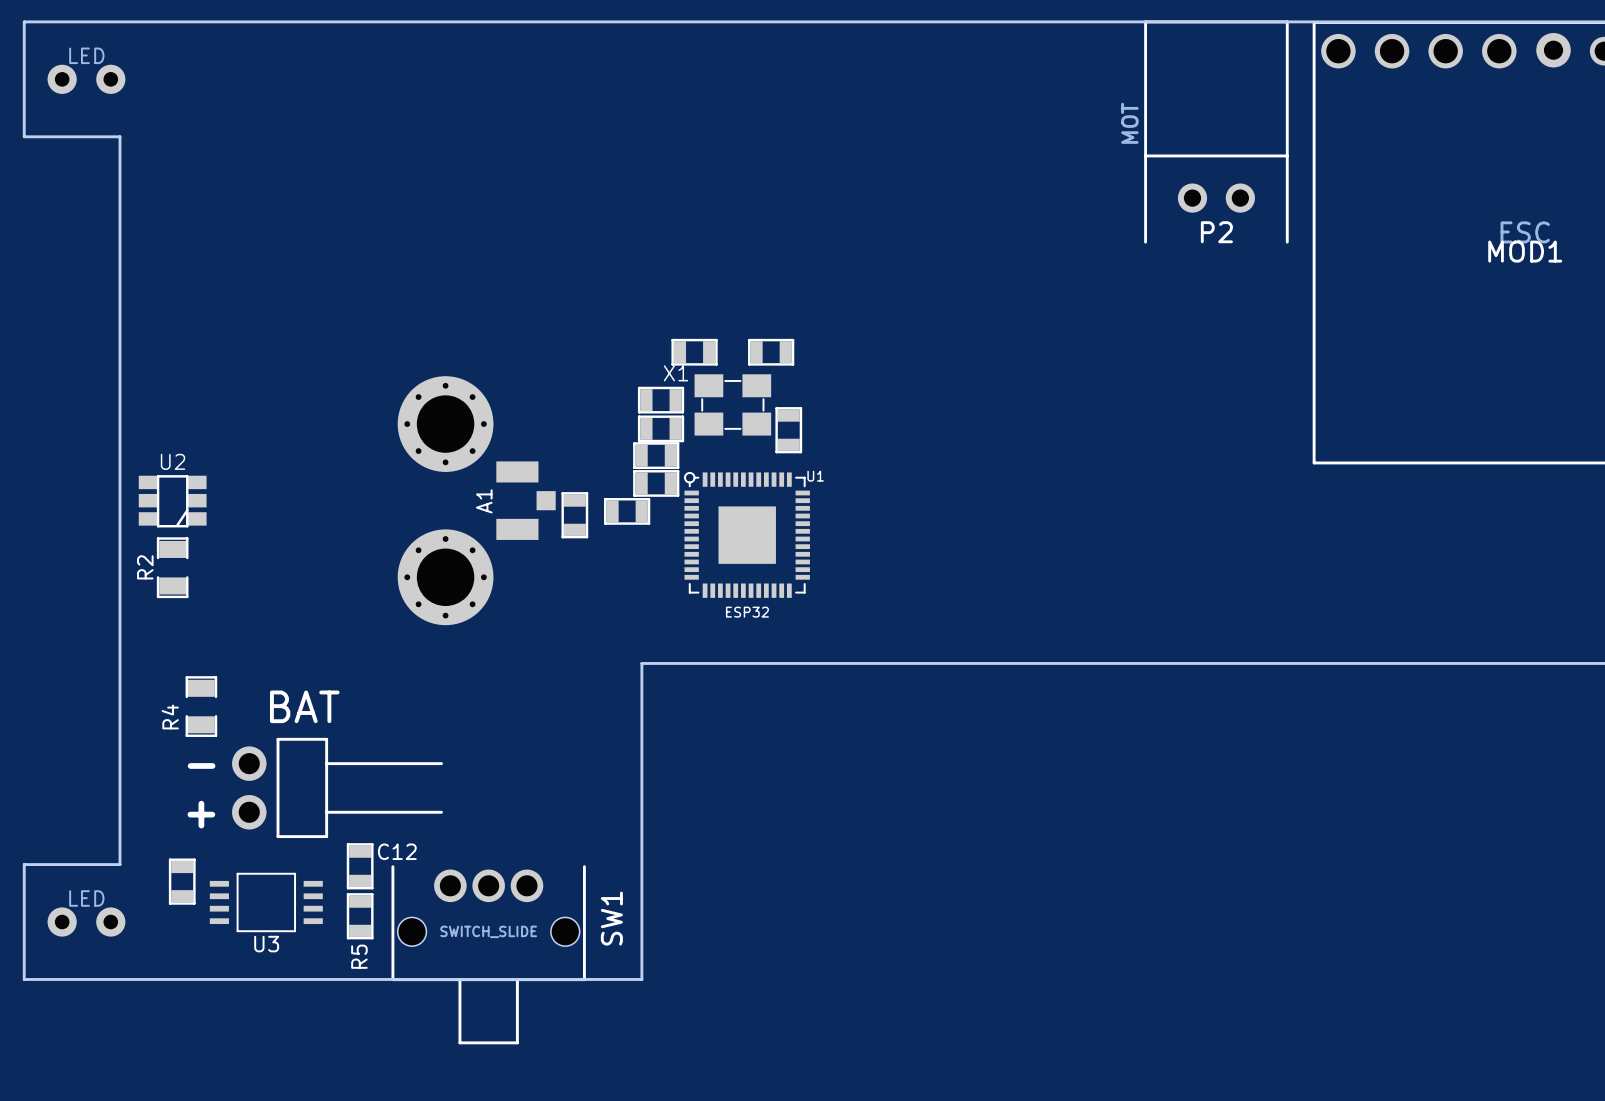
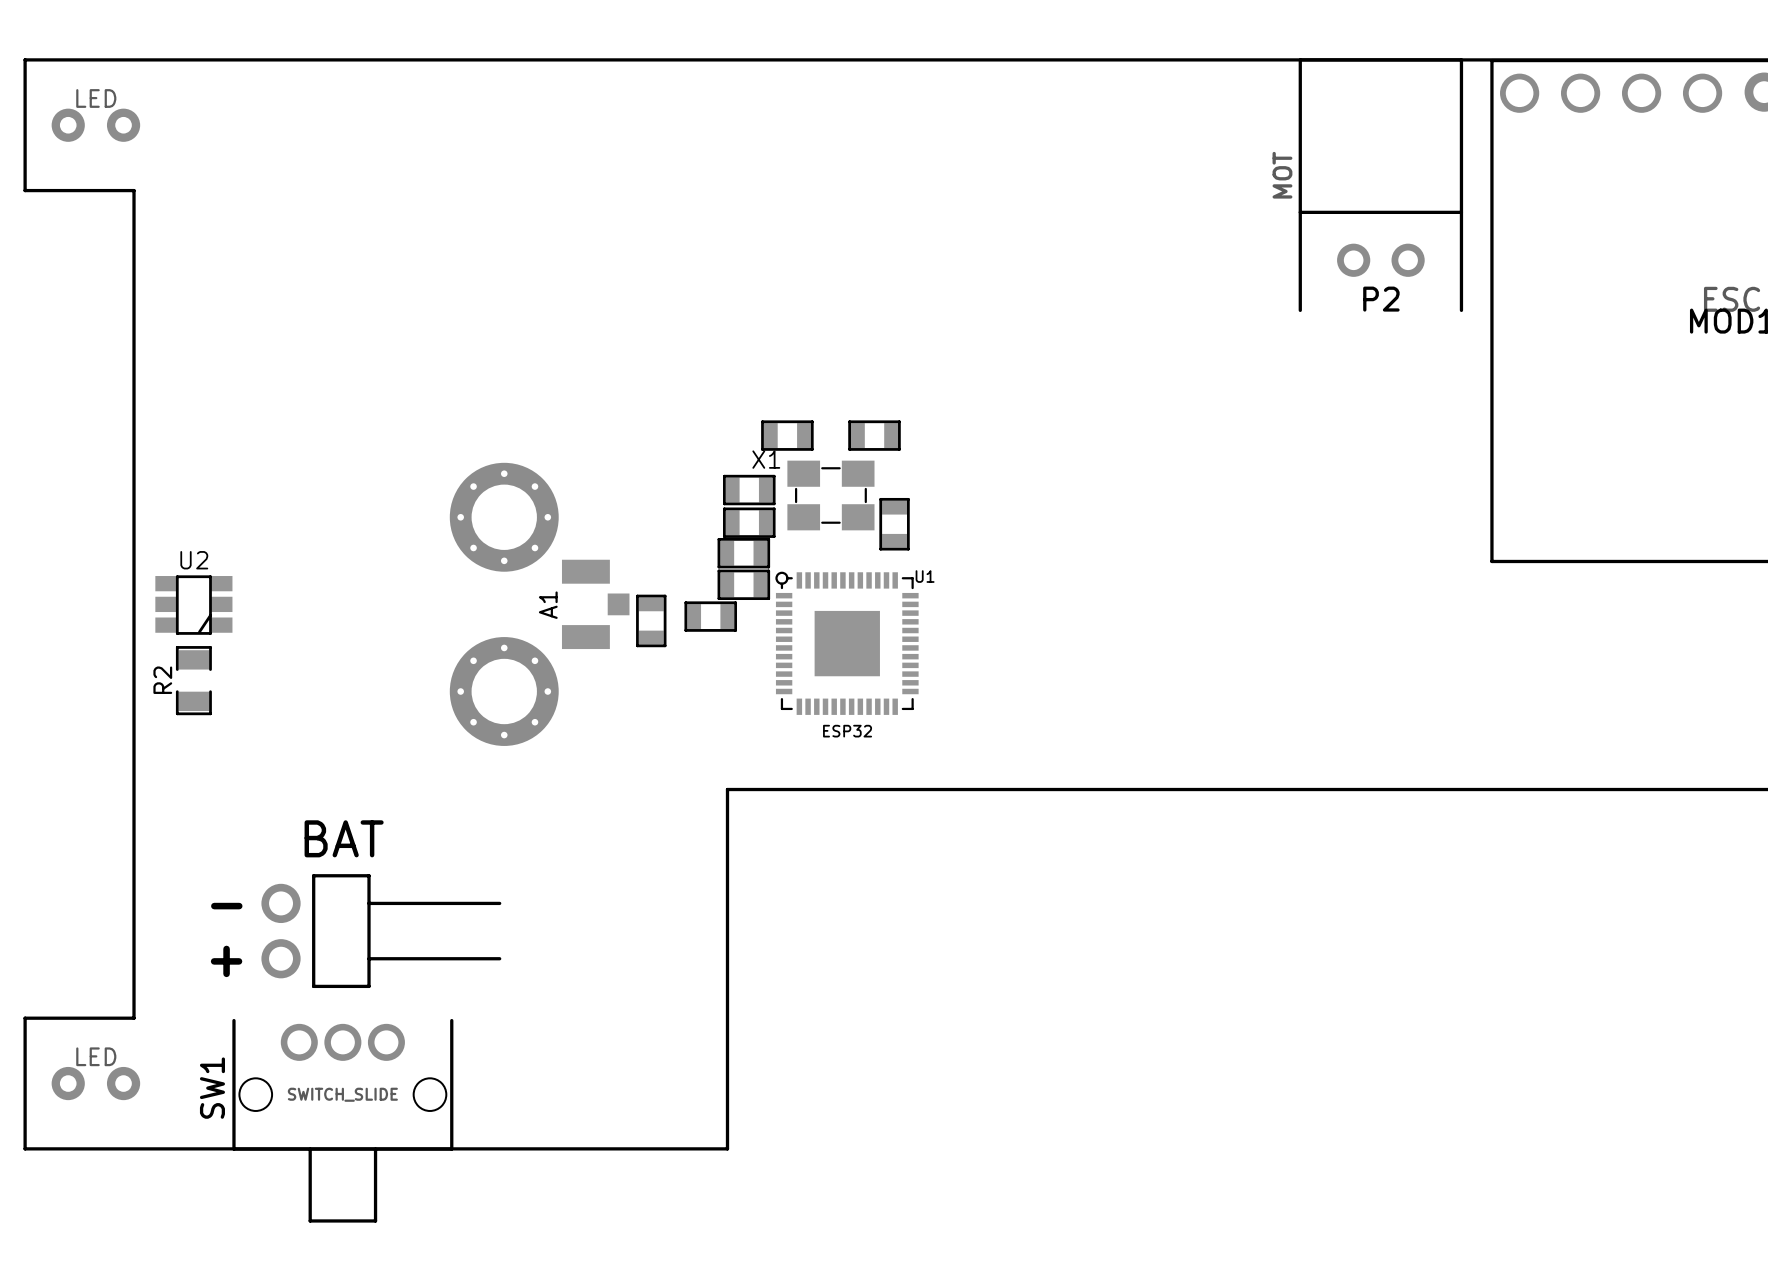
R4: (201, 706) -> none
C12: (360, 866) -> none
part: (182, 881) -> none
U3: (266, 902) -> none
R5: (360, 916) -> none
SW1 name position: SW1 (611, 918) -> SW1 (212, 1088)
SW1 position: (488, 954) -> (342, 1120)

